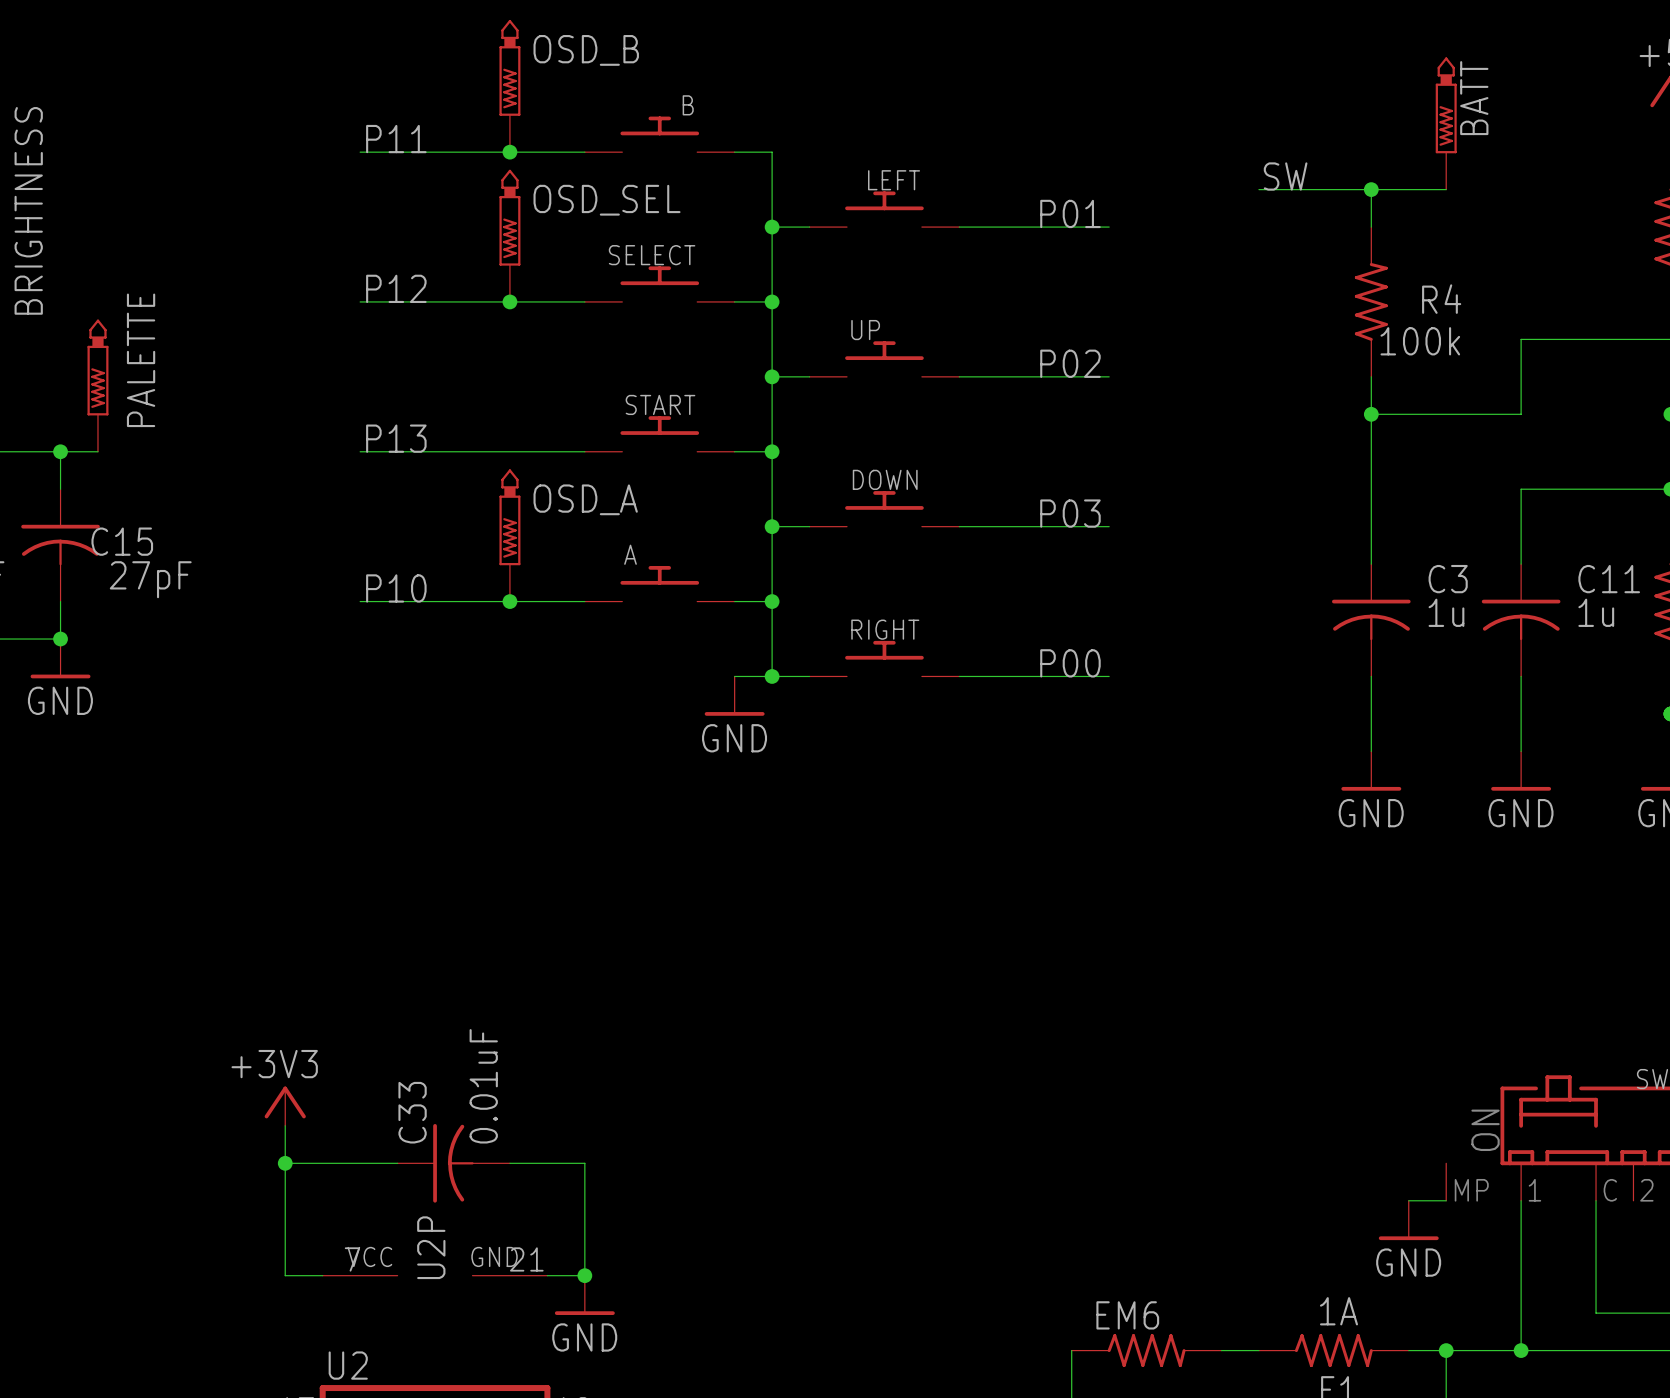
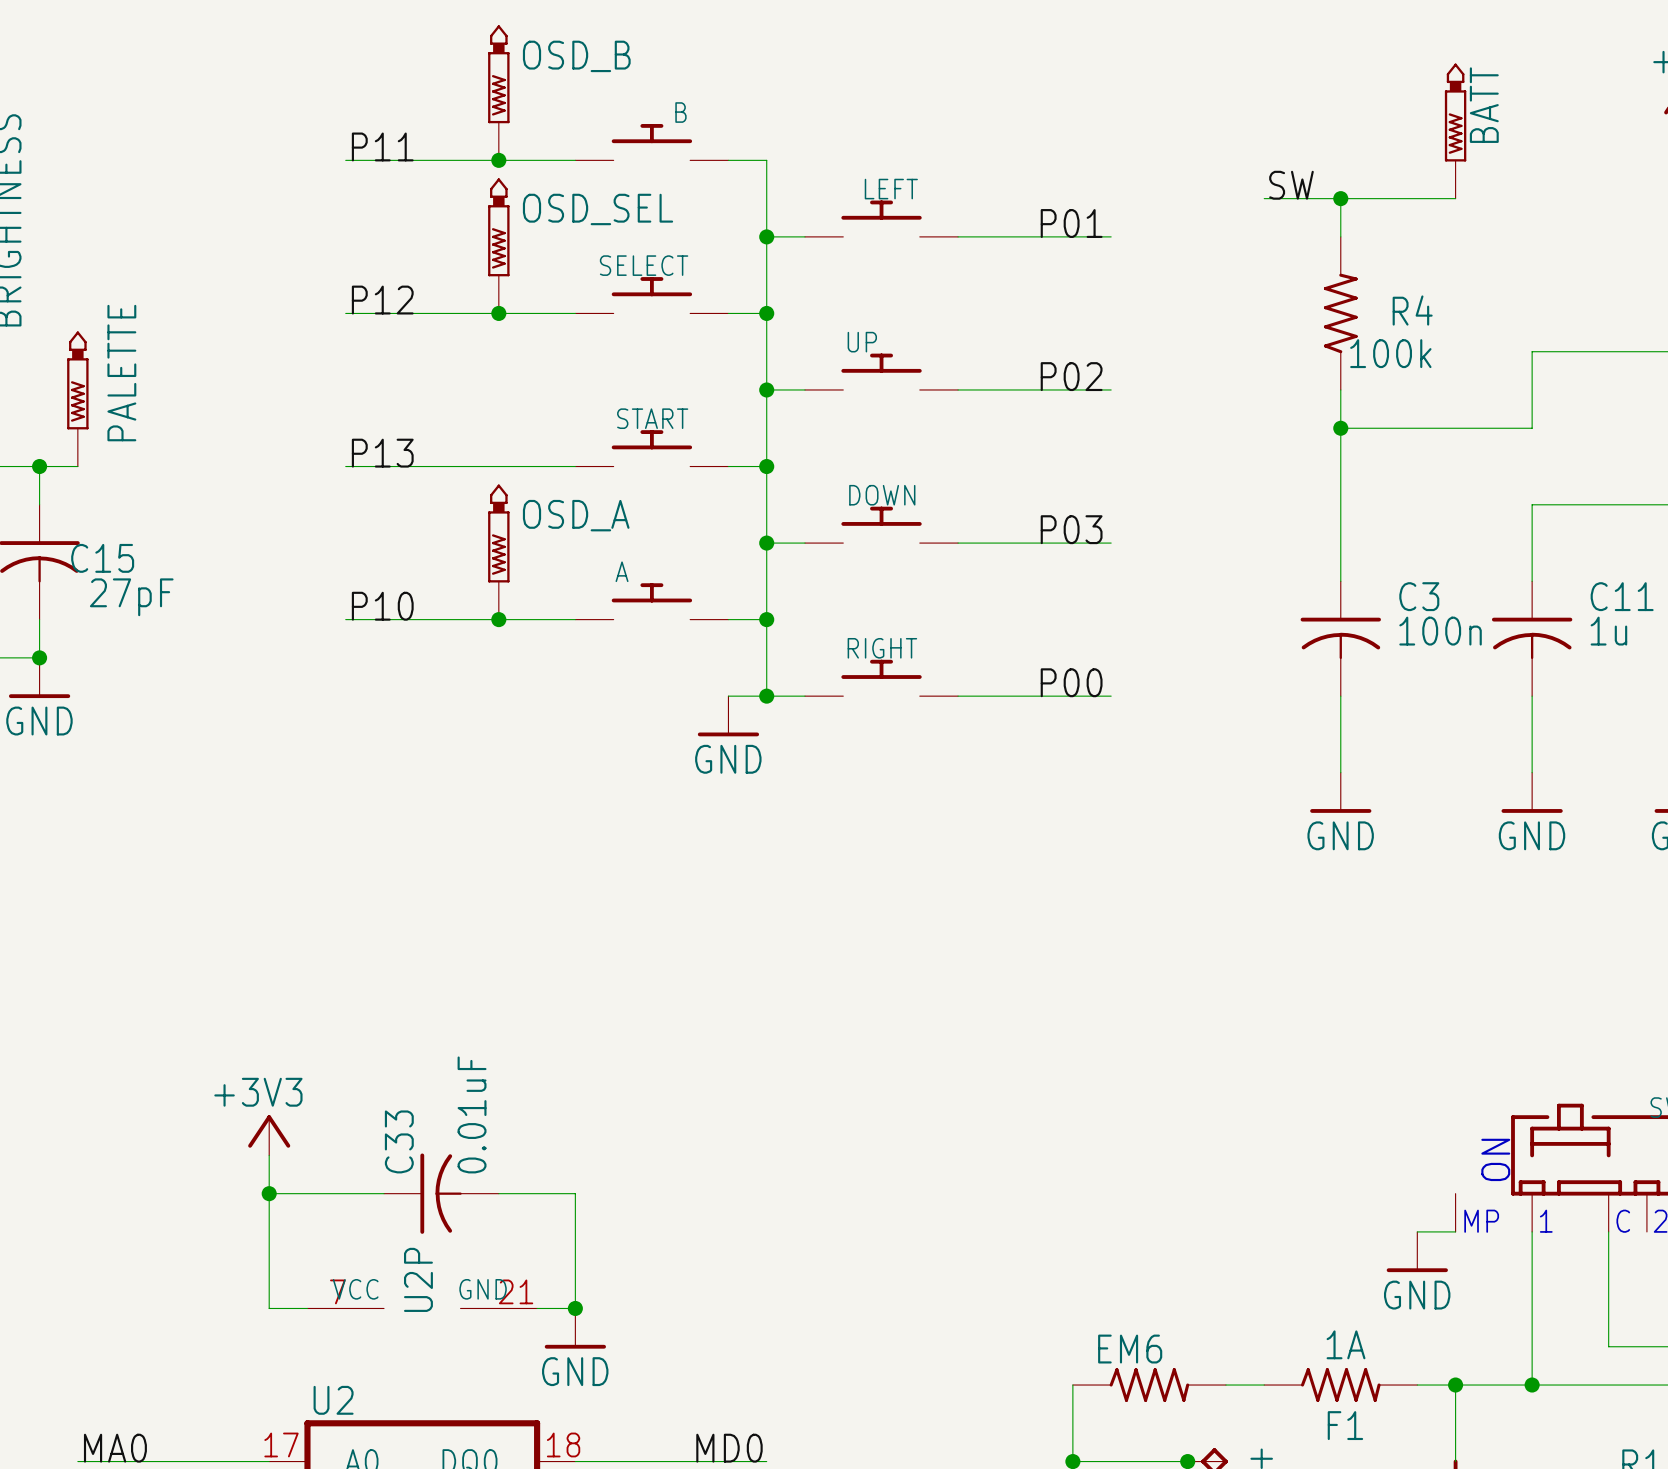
wire: (1371, 189) (1371, 227) -> (1340, 198) (1340, 236)
junction position: (1371, 189) -> (1340, 198)
R4 position: (1371, 301) -> (1340, 313)
wire: (1371, 376) (1371, 564) -> (1340, 389) (1340, 581)
wire: none -> (1340, 428) (1379, 428)
junction position: (1371, 414) -> (1340, 428)
C3 value: 1u (1446, 612) -> 100n (1440, 631)
C3 position: (1371, 620) -> (1340, 638)
wire: (1371, 676) (1371, 751) -> (1340, 696) (1340, 772)
power symbol position: GND (1371, 771) -> GND (1340, 792)

